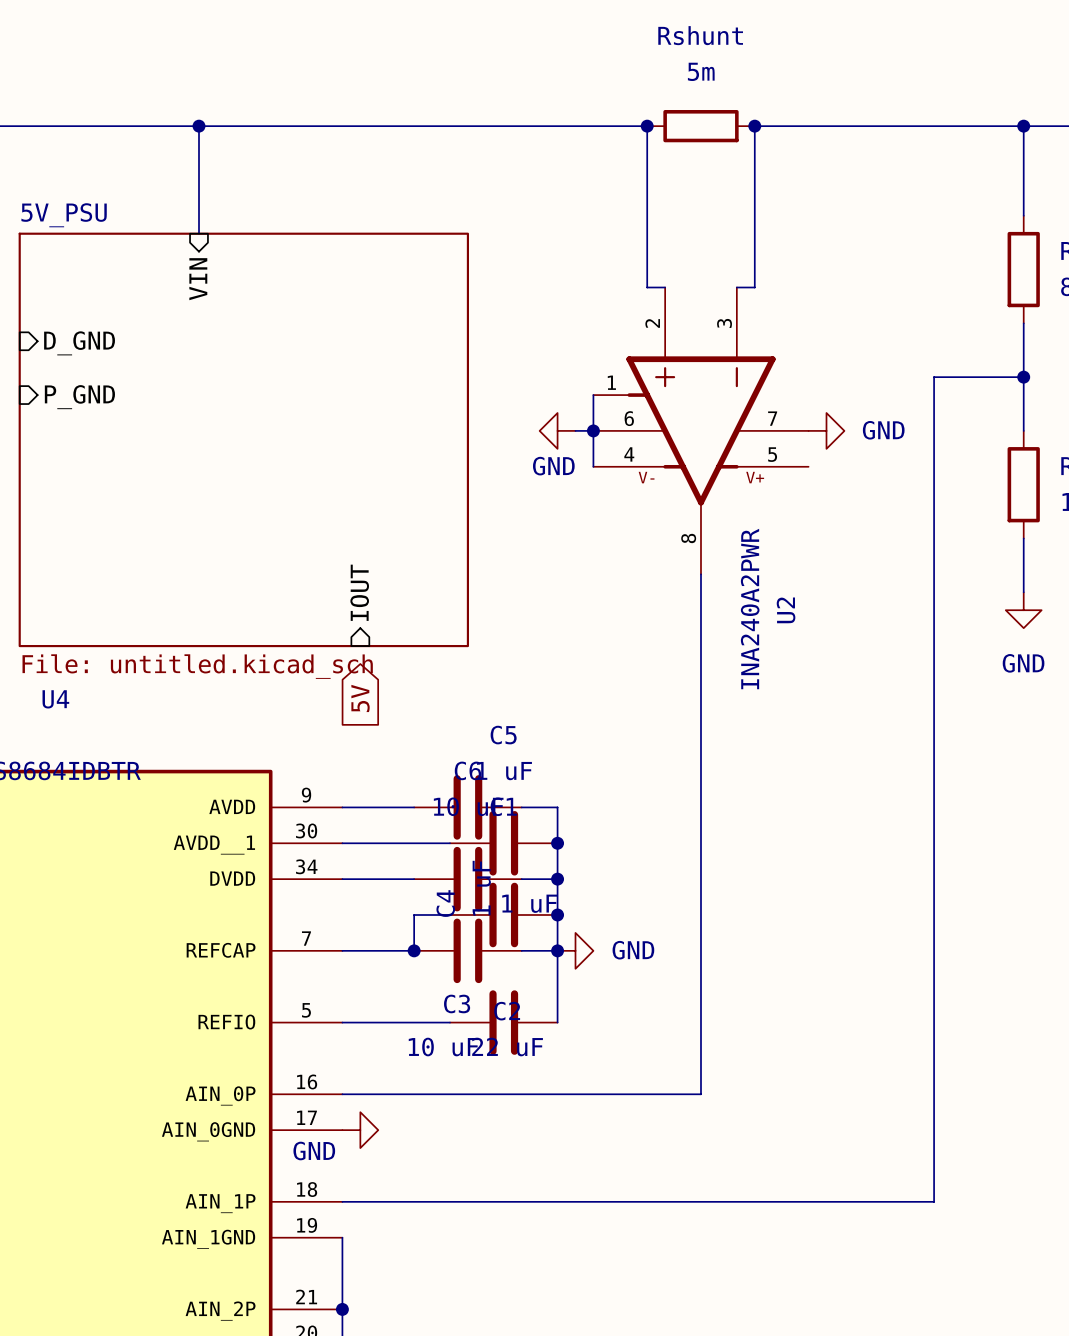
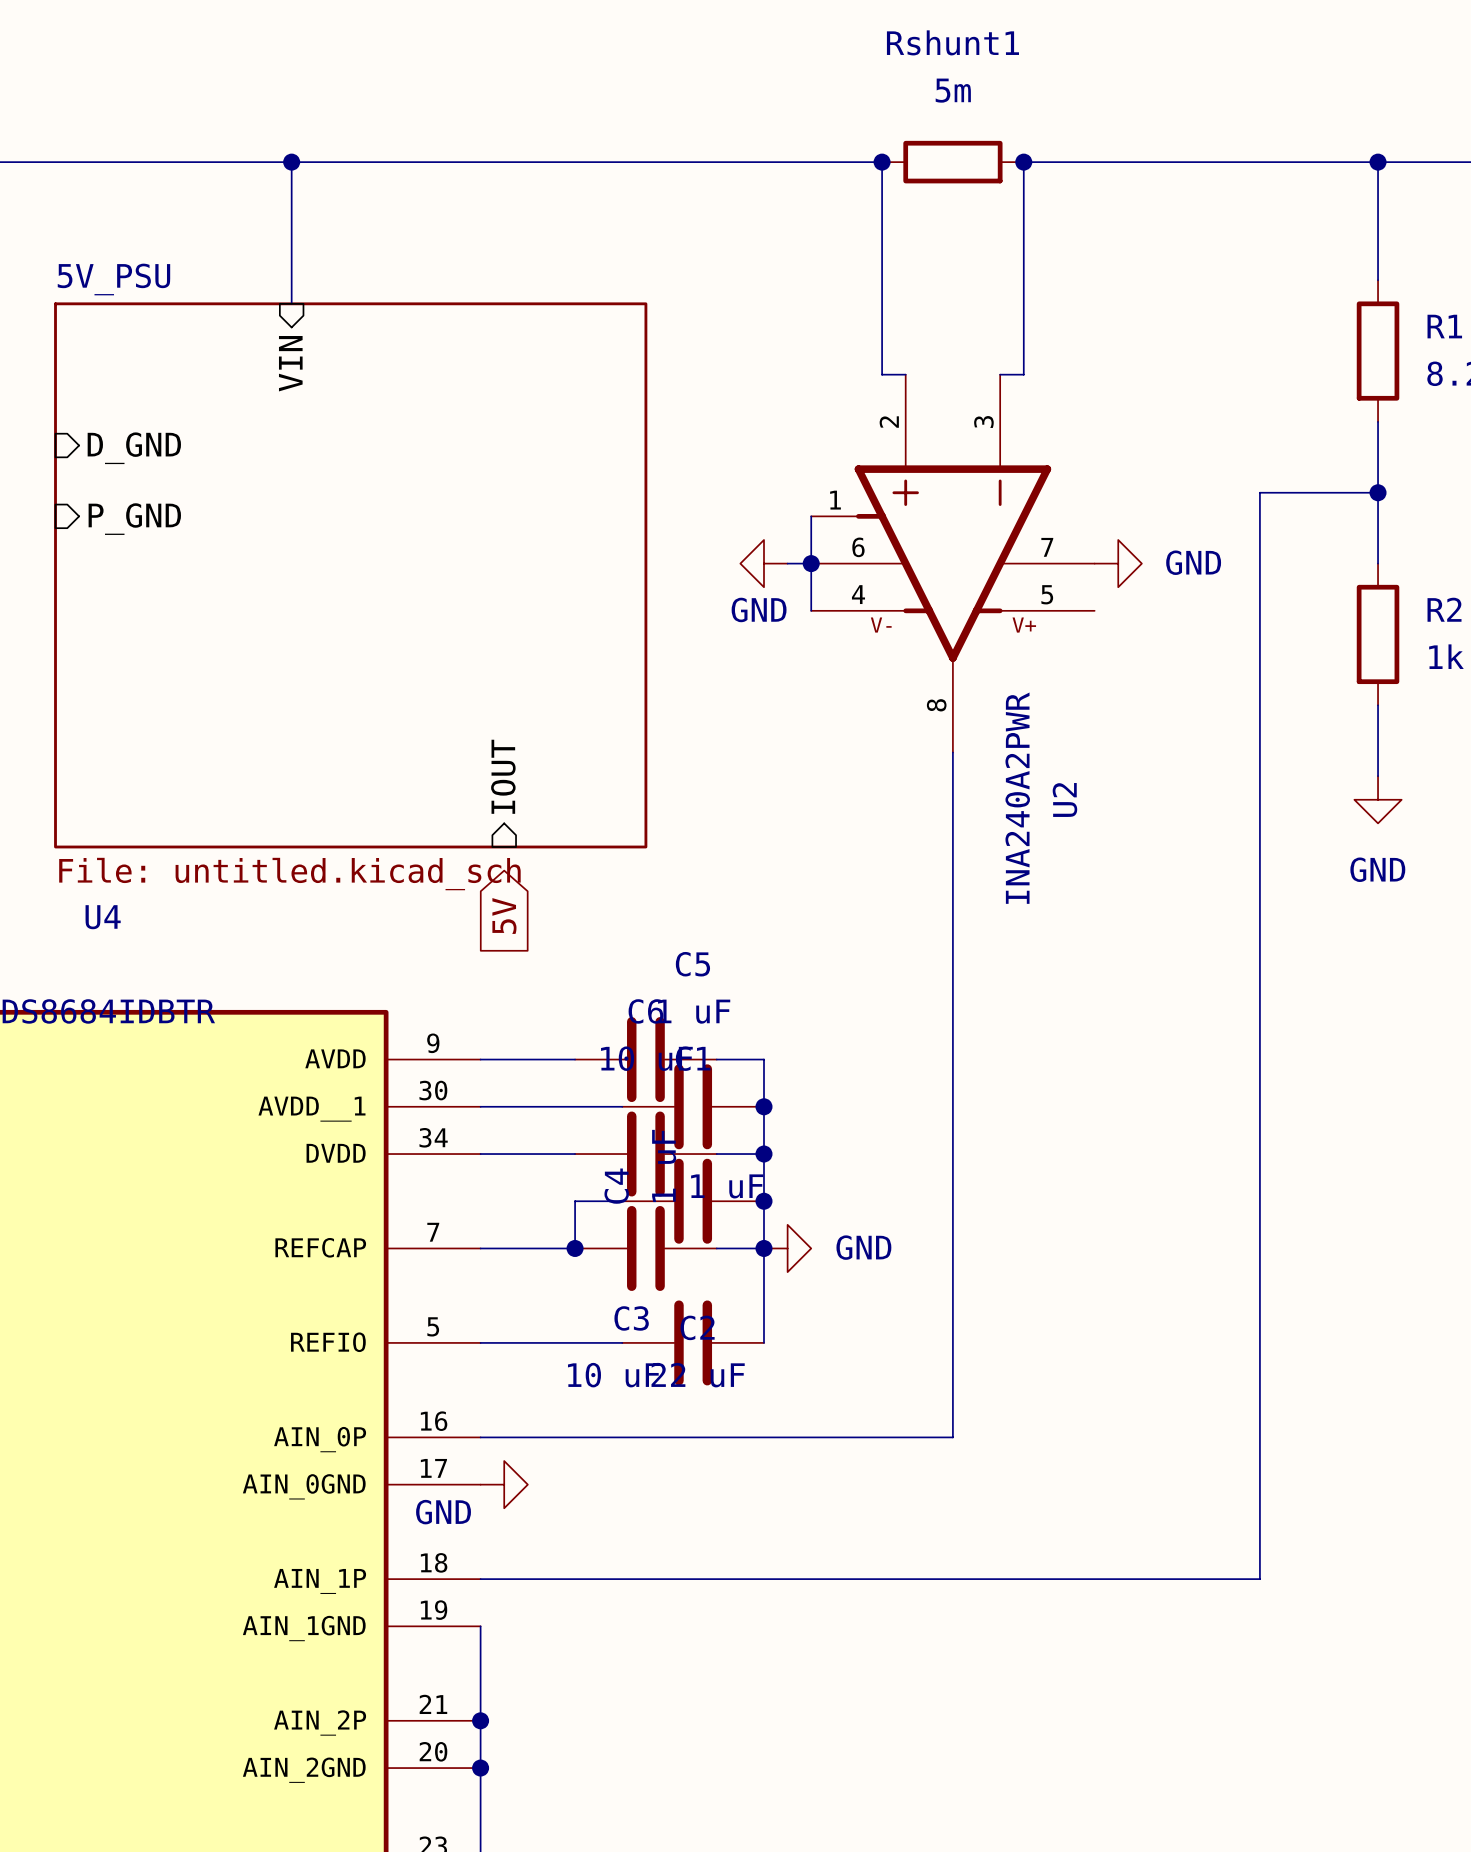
Rshunt name: Rshunt (700, 35) -> Rshunt1 (952, 42)

